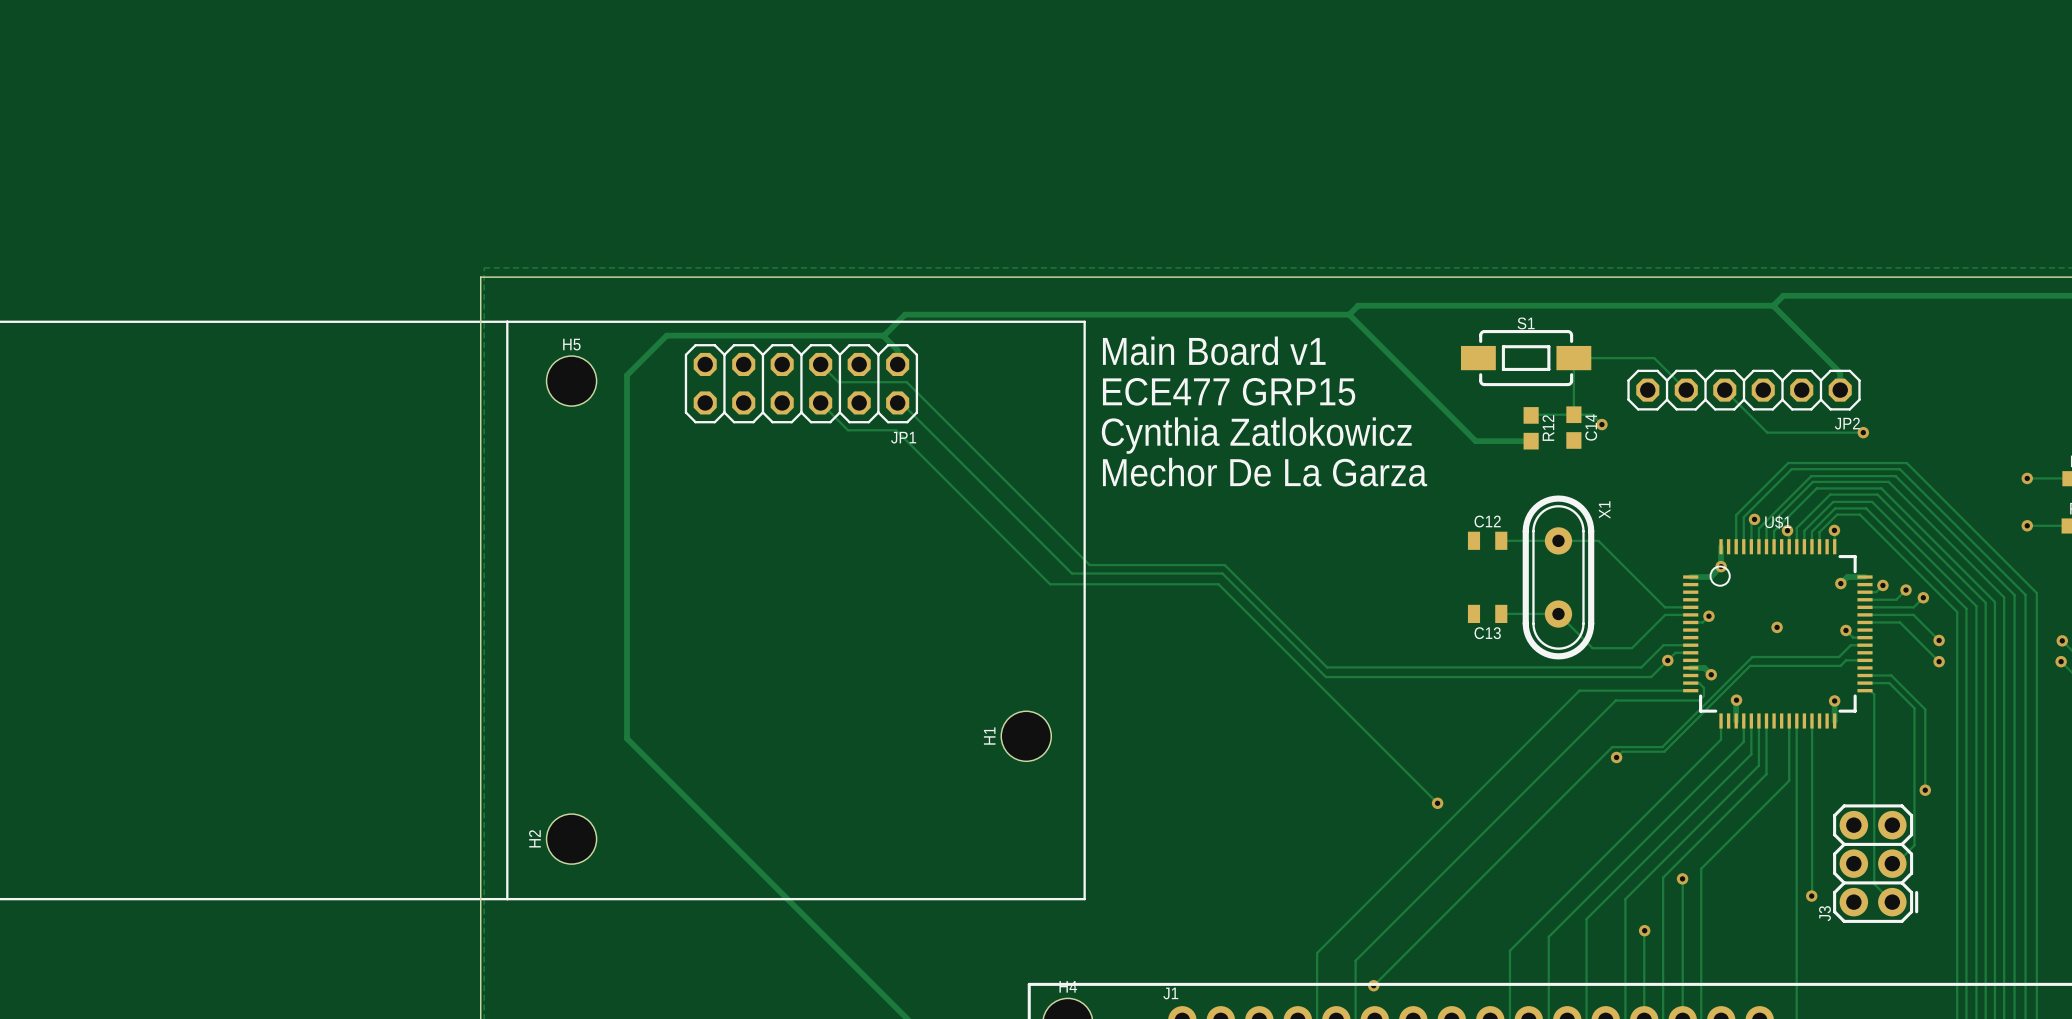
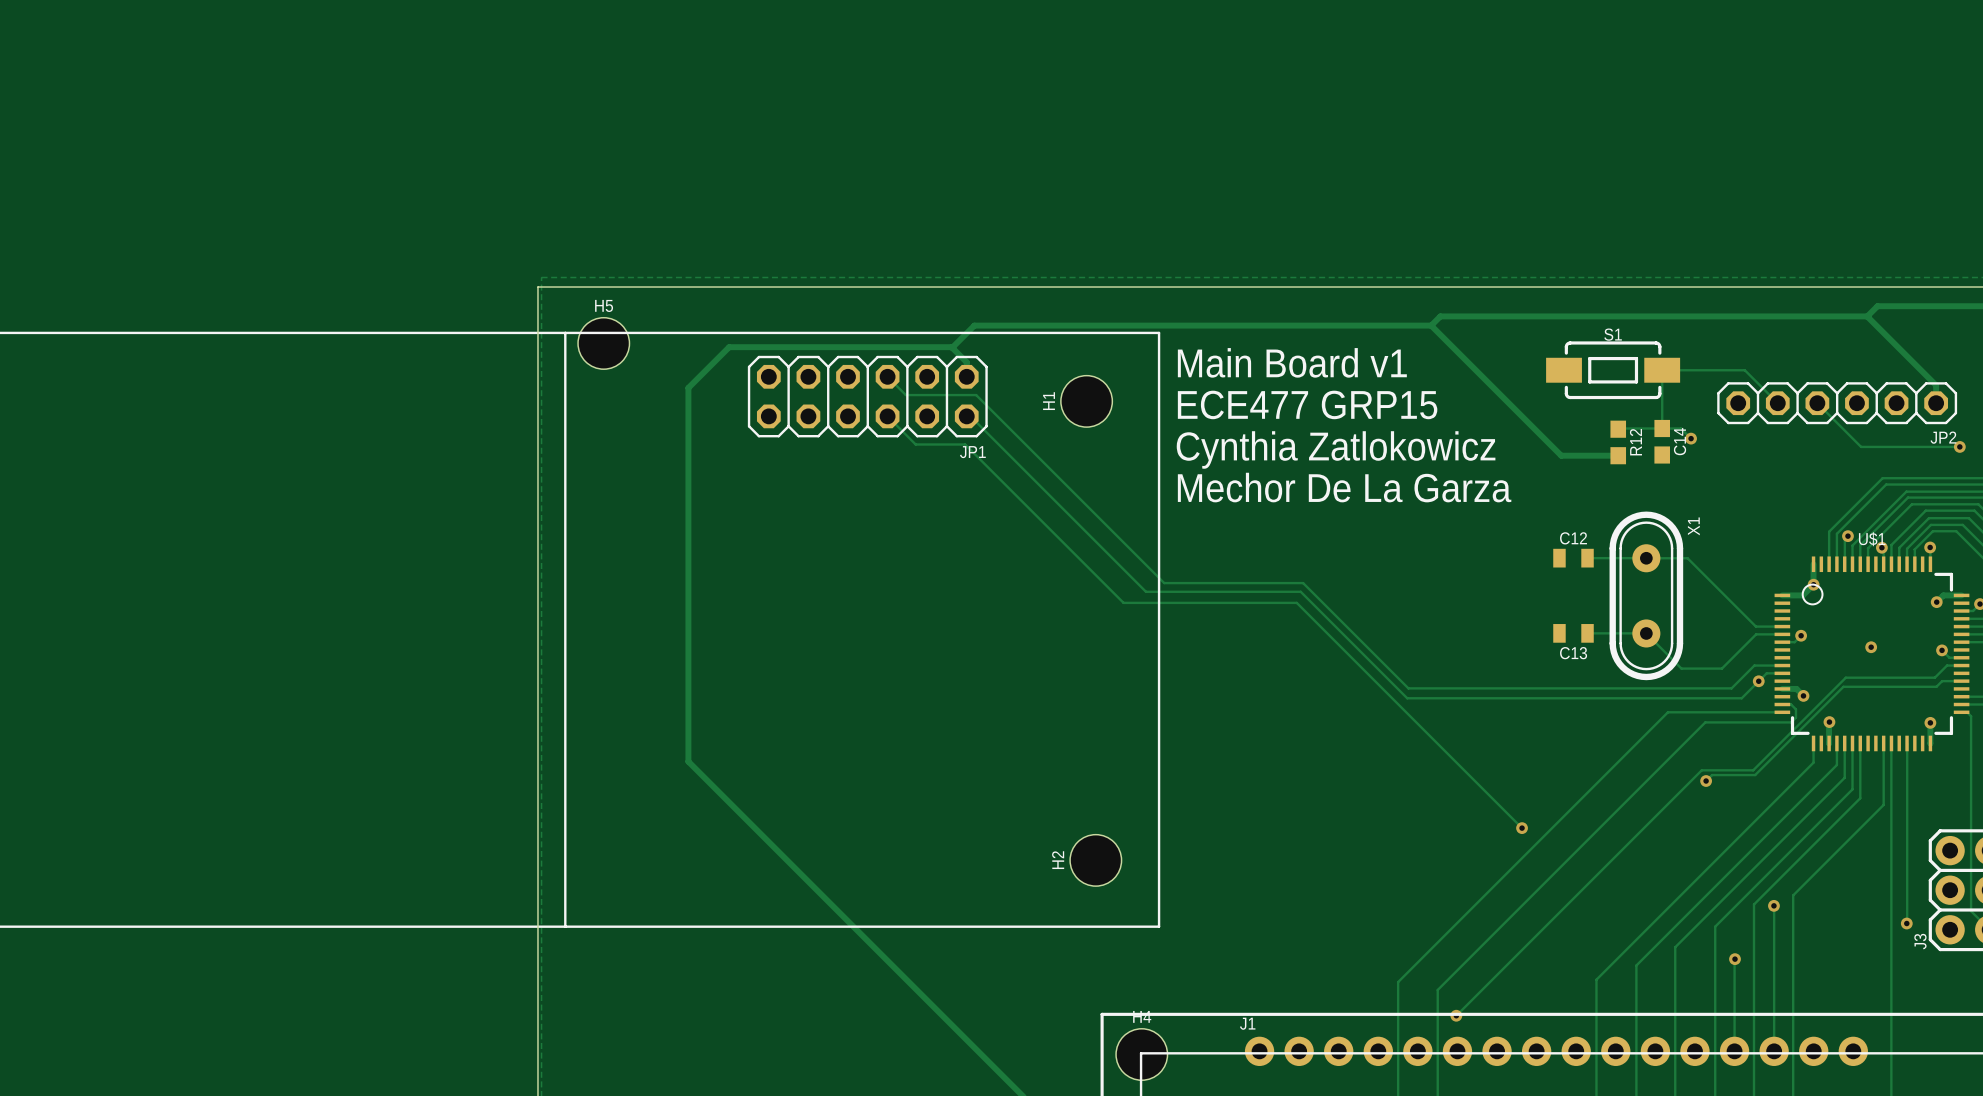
H5 position: (571, 381) -> (603, 343)
H1 position: (1026, 736) -> (1086, 401)
H2 position: (571, 839) -> (1095, 860)

